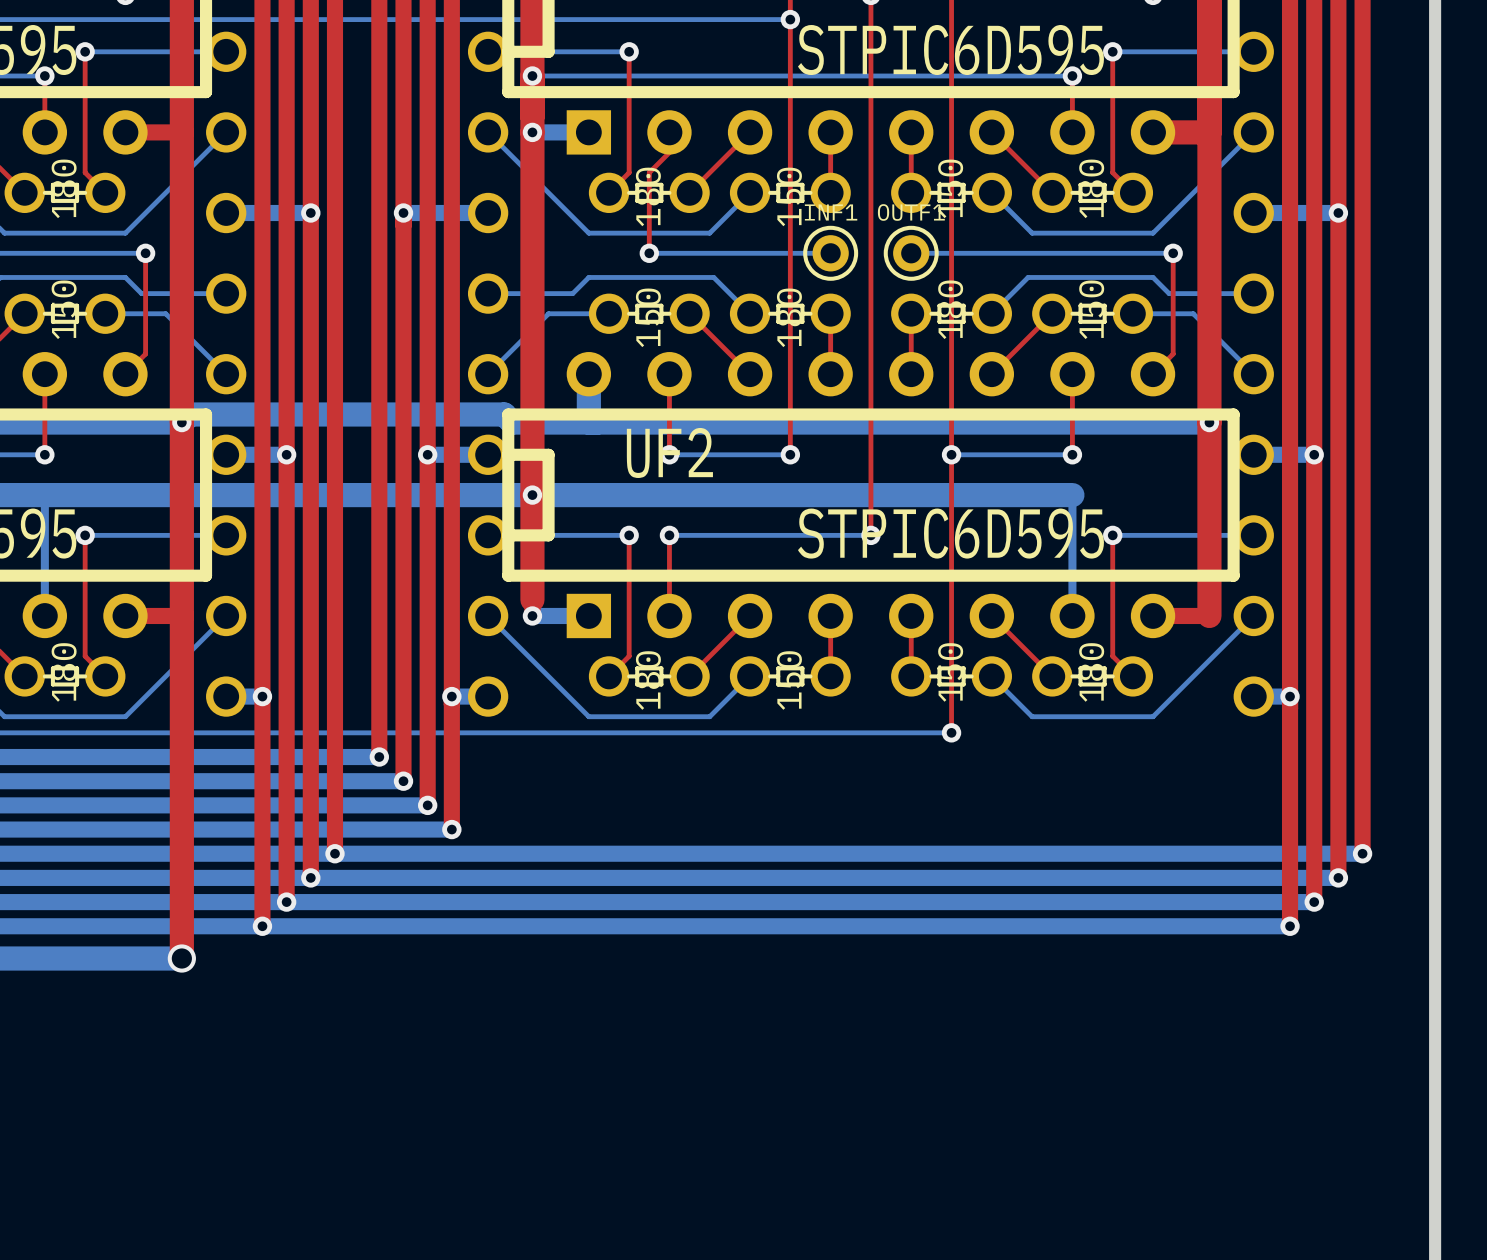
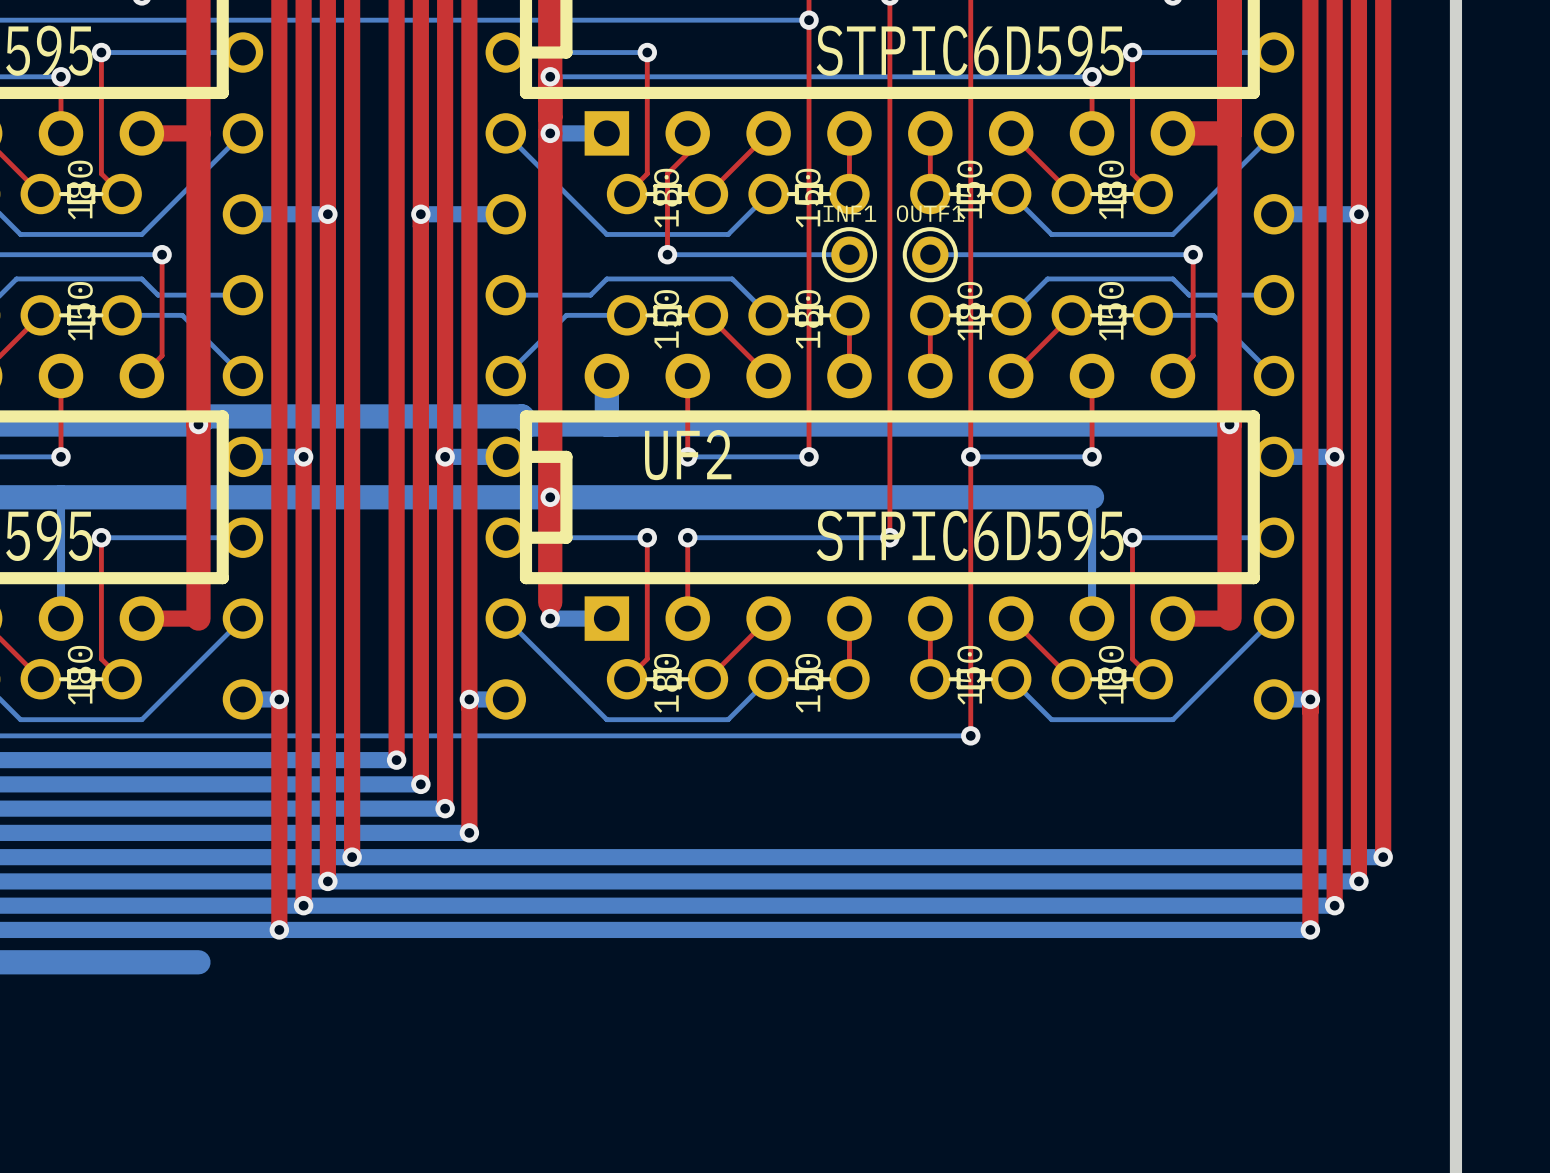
top track: (181, 615) (181, 958) -> none
via: (181, 958) -> none

